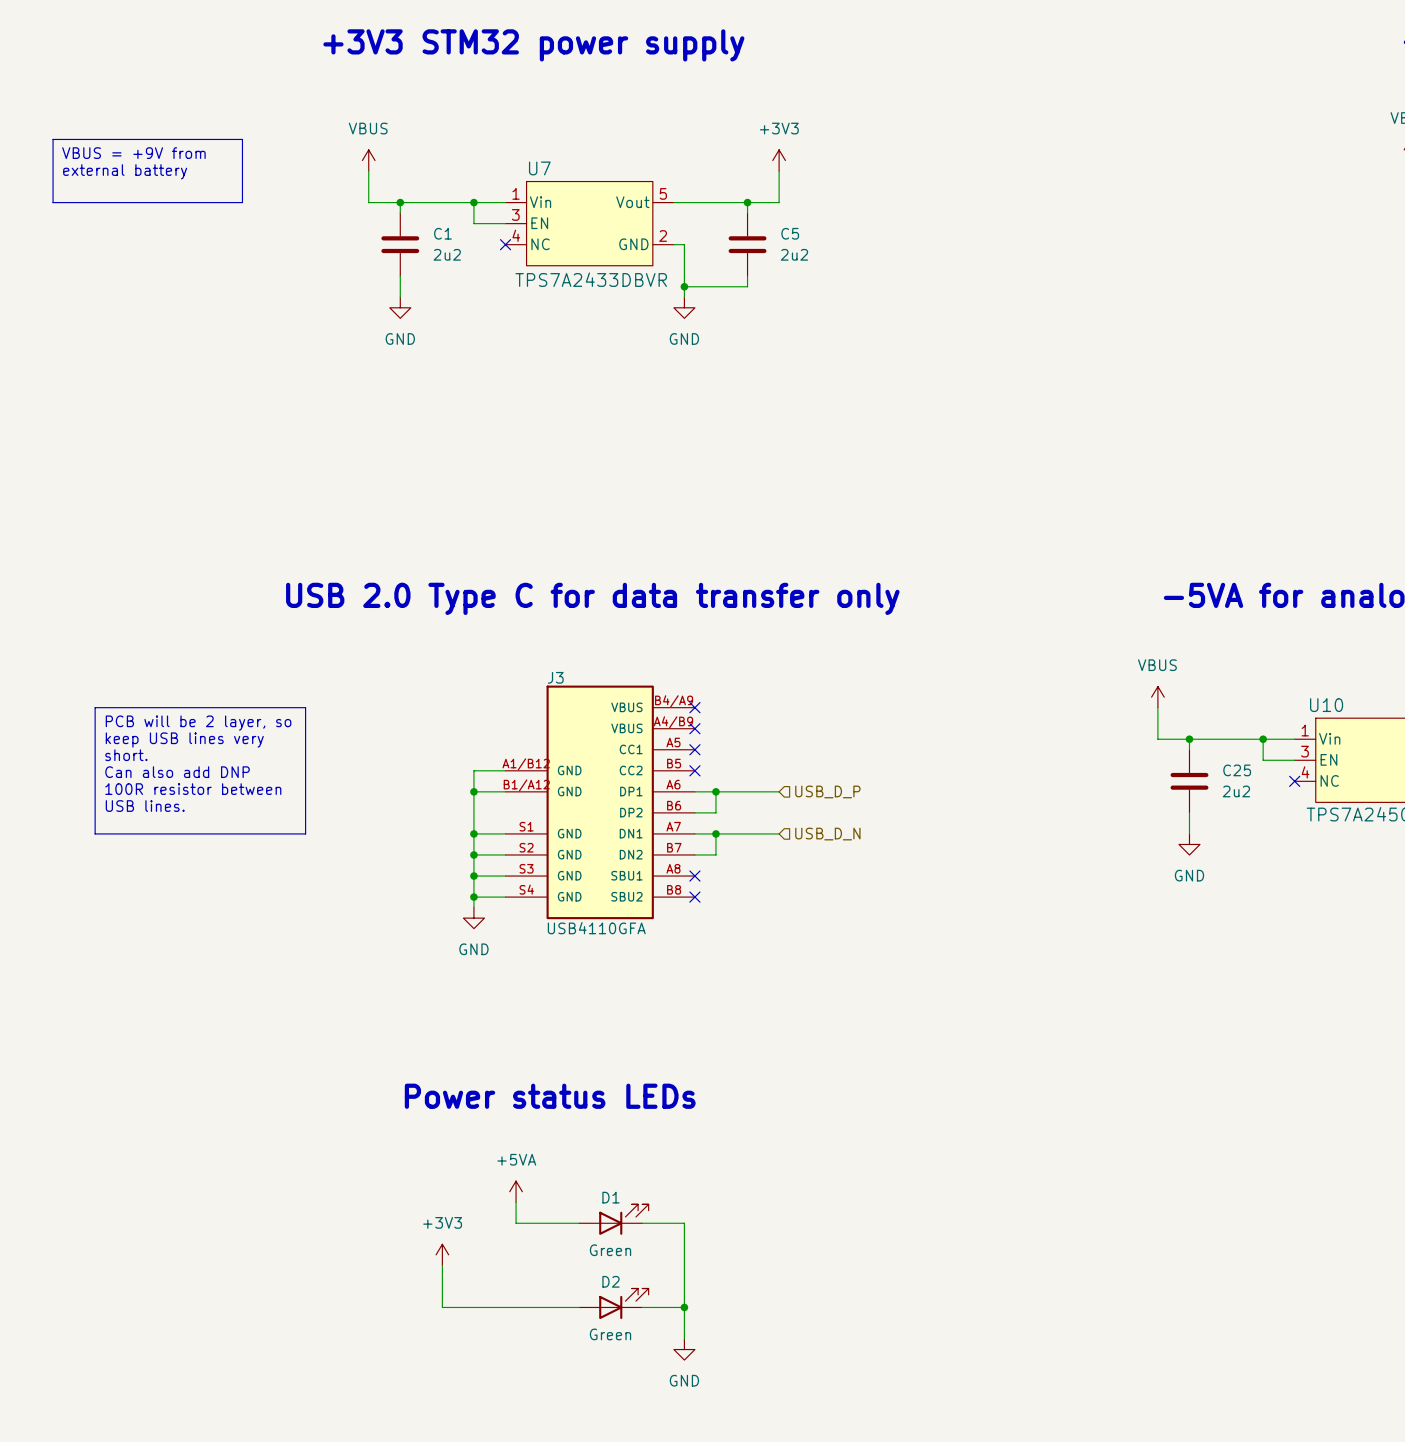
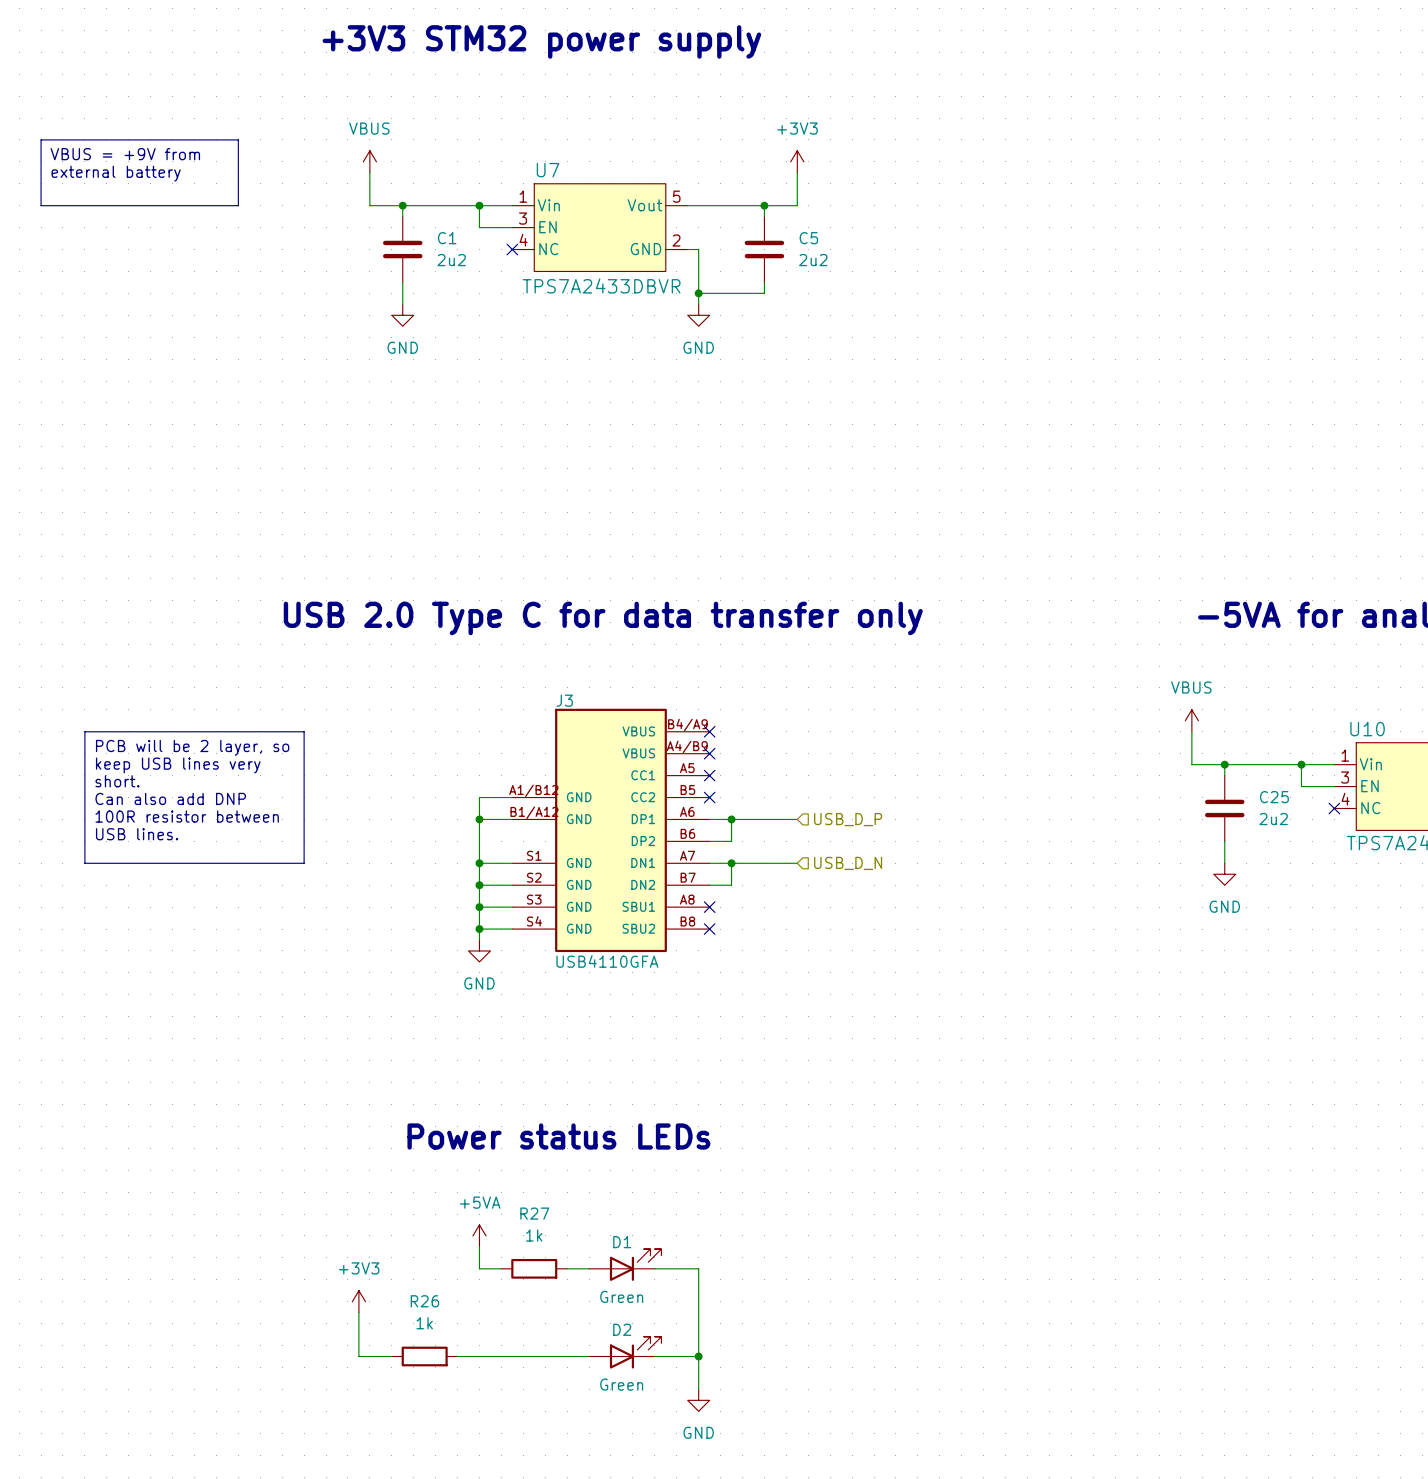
power symbol position: +5VA (516, 1191) -> +5VA (479, 1235)
wire: none -> (479, 1246) (479, 1268) (501, 1268)
wire: (516, 1202) (516, 1223) (558, 1223) -> none
R27: none -> 1k (534, 1268)
power symbol position: +3V3 (442, 1254) -> +3V3 (358, 1301)
wire: none -> (358, 1312) (358, 1356) (391, 1356)
wire: (442, 1265) (442, 1307) (452, 1307) -> none
R26: none -> 1k (424, 1356)

